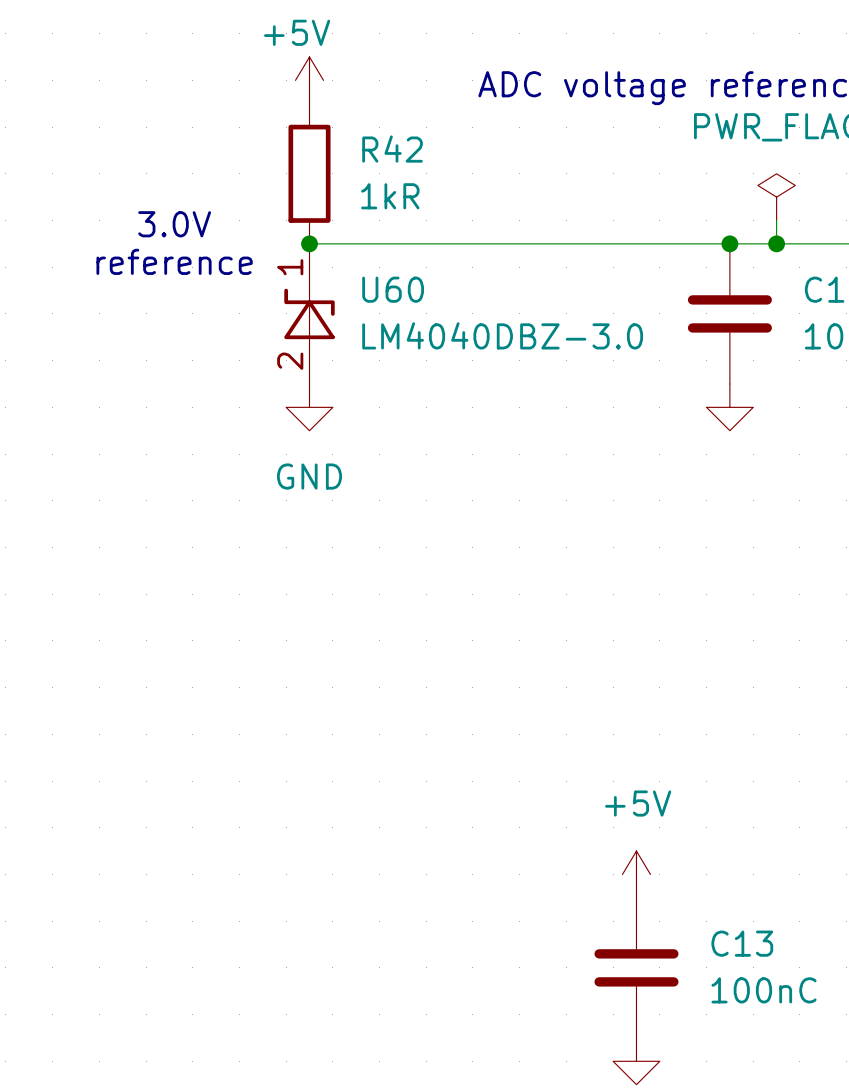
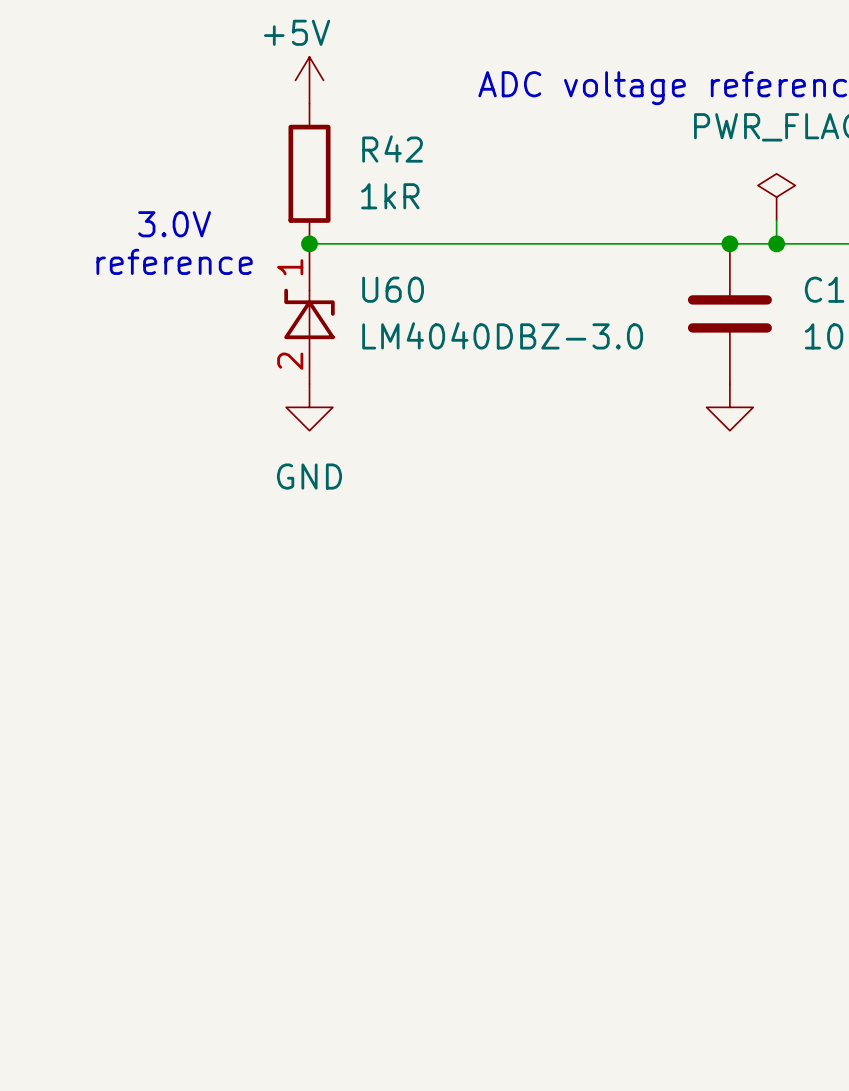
power symbol: +5V (636, 874) -> none
C13: 100nC (636, 967) -> none
power symbol: (636, 1061) -> none

